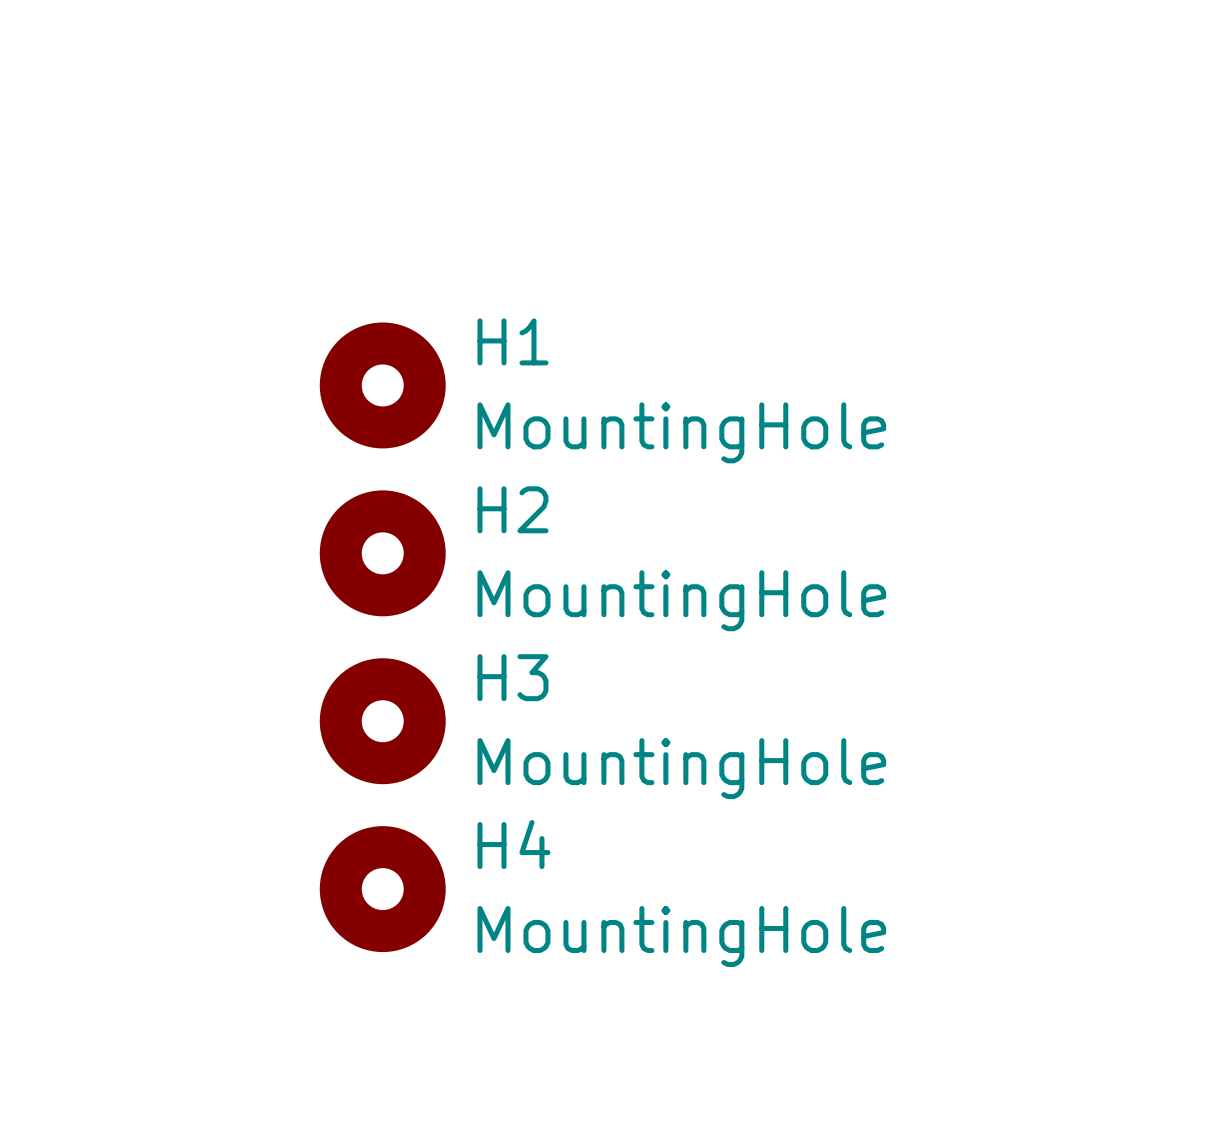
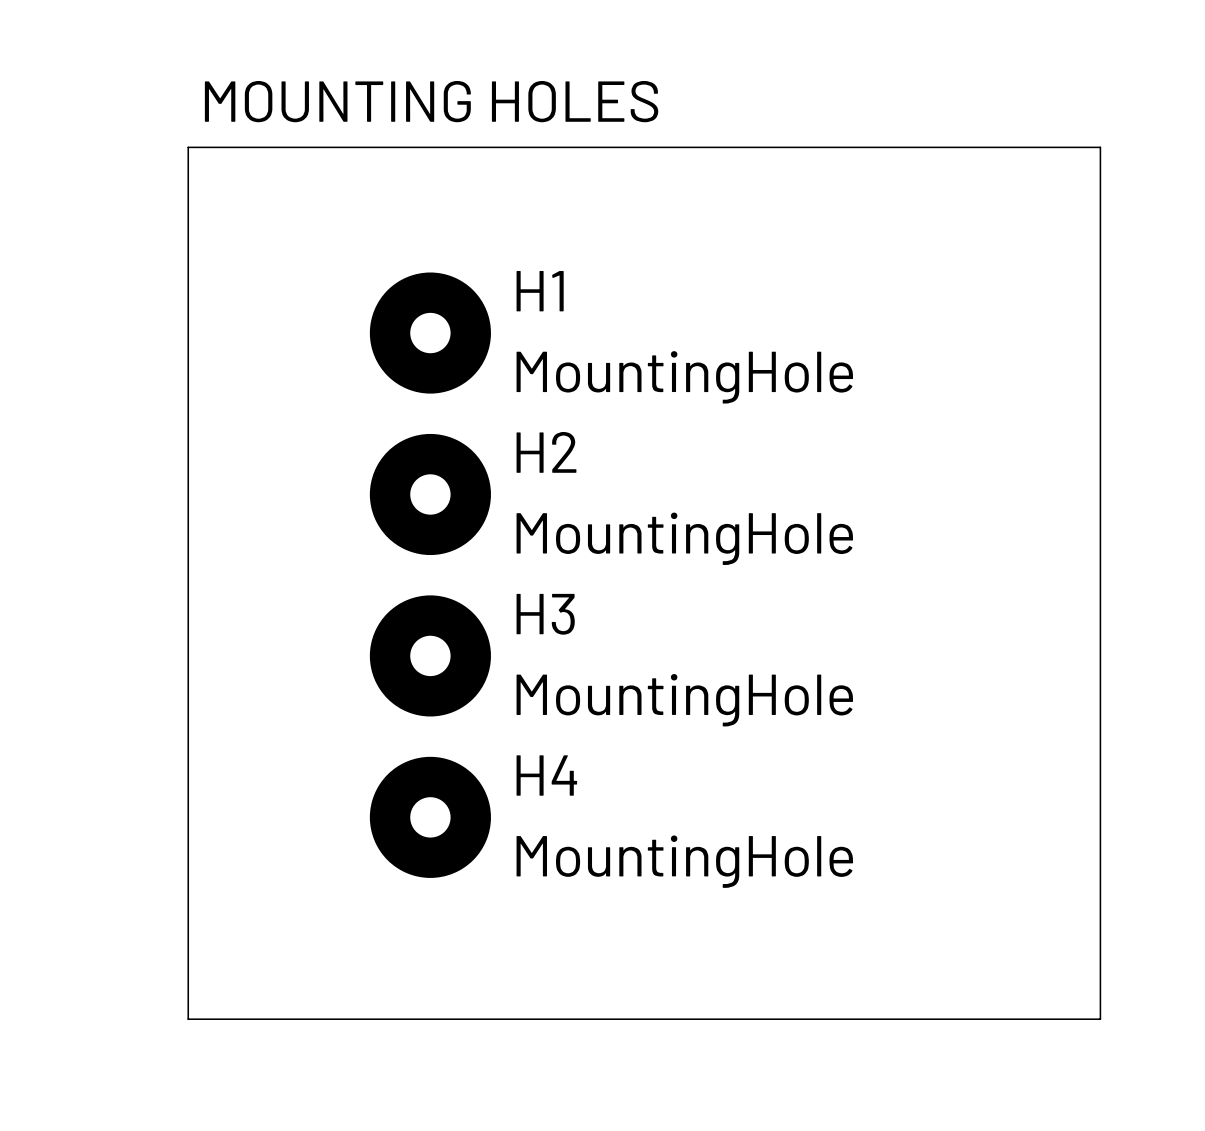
text: none -> MOUNTING HOLES (431, 101)
line: none -> (188, 147) (1100, 147) (1100, 1019) (188, 1019) (188, 147)

